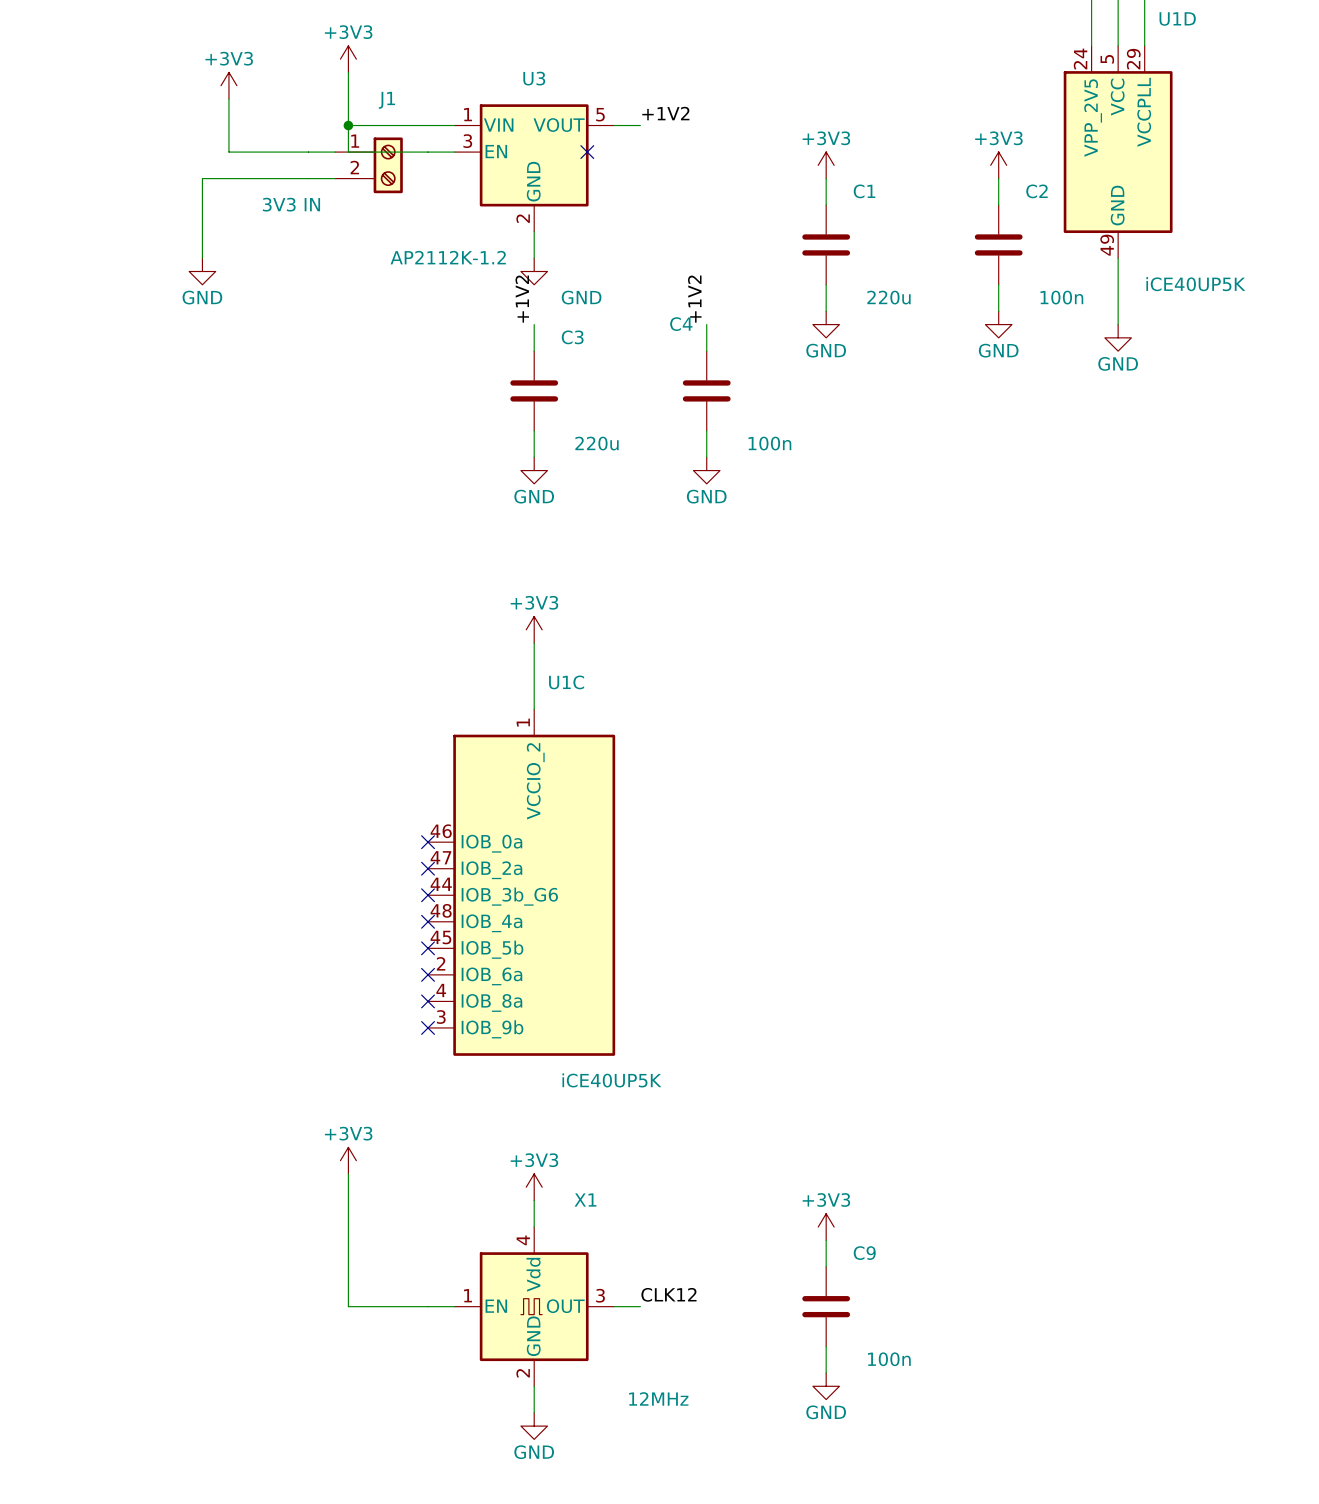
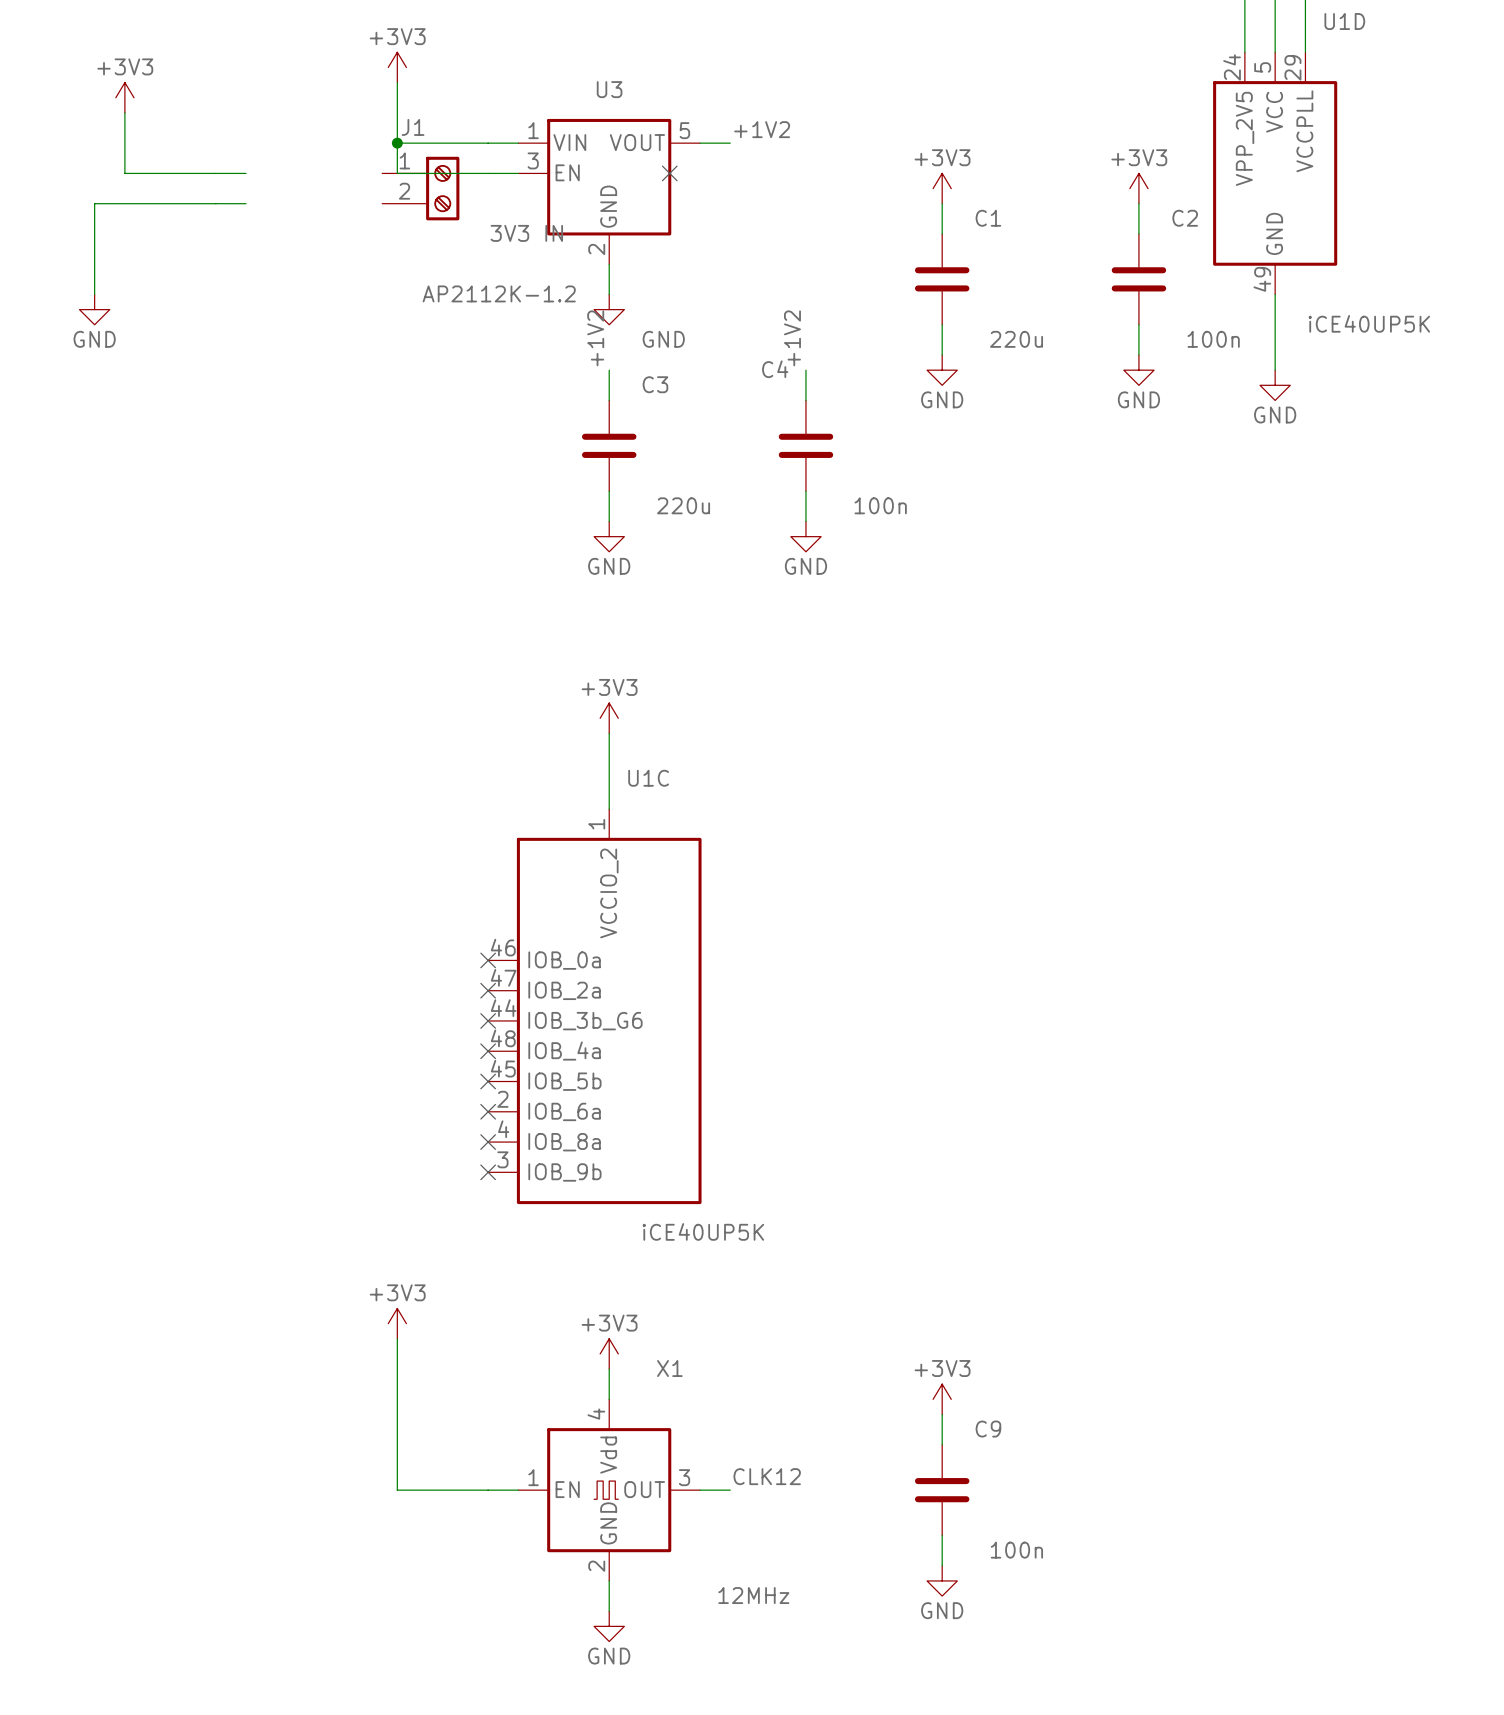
power symbol position: +3V3 (228, 85) -> +3V3 (124, 97)
wire: (228, 98) (228, 152) (335, 152) -> (124, 112) (124, 173) (245, 173)
J1 name position: J1 (386, 100) -> J1 (413, 127)
wire: (202, 178) (202, 258) -> (230, 203) (94, 203) (94, 294)
wire: (215, 178) (335, 178) -> none
J1 value position: 3V3 IN (291, 204) -> 3V3 IN (526, 233)
power symbol position: GND (202, 271) -> GND (94, 309)

